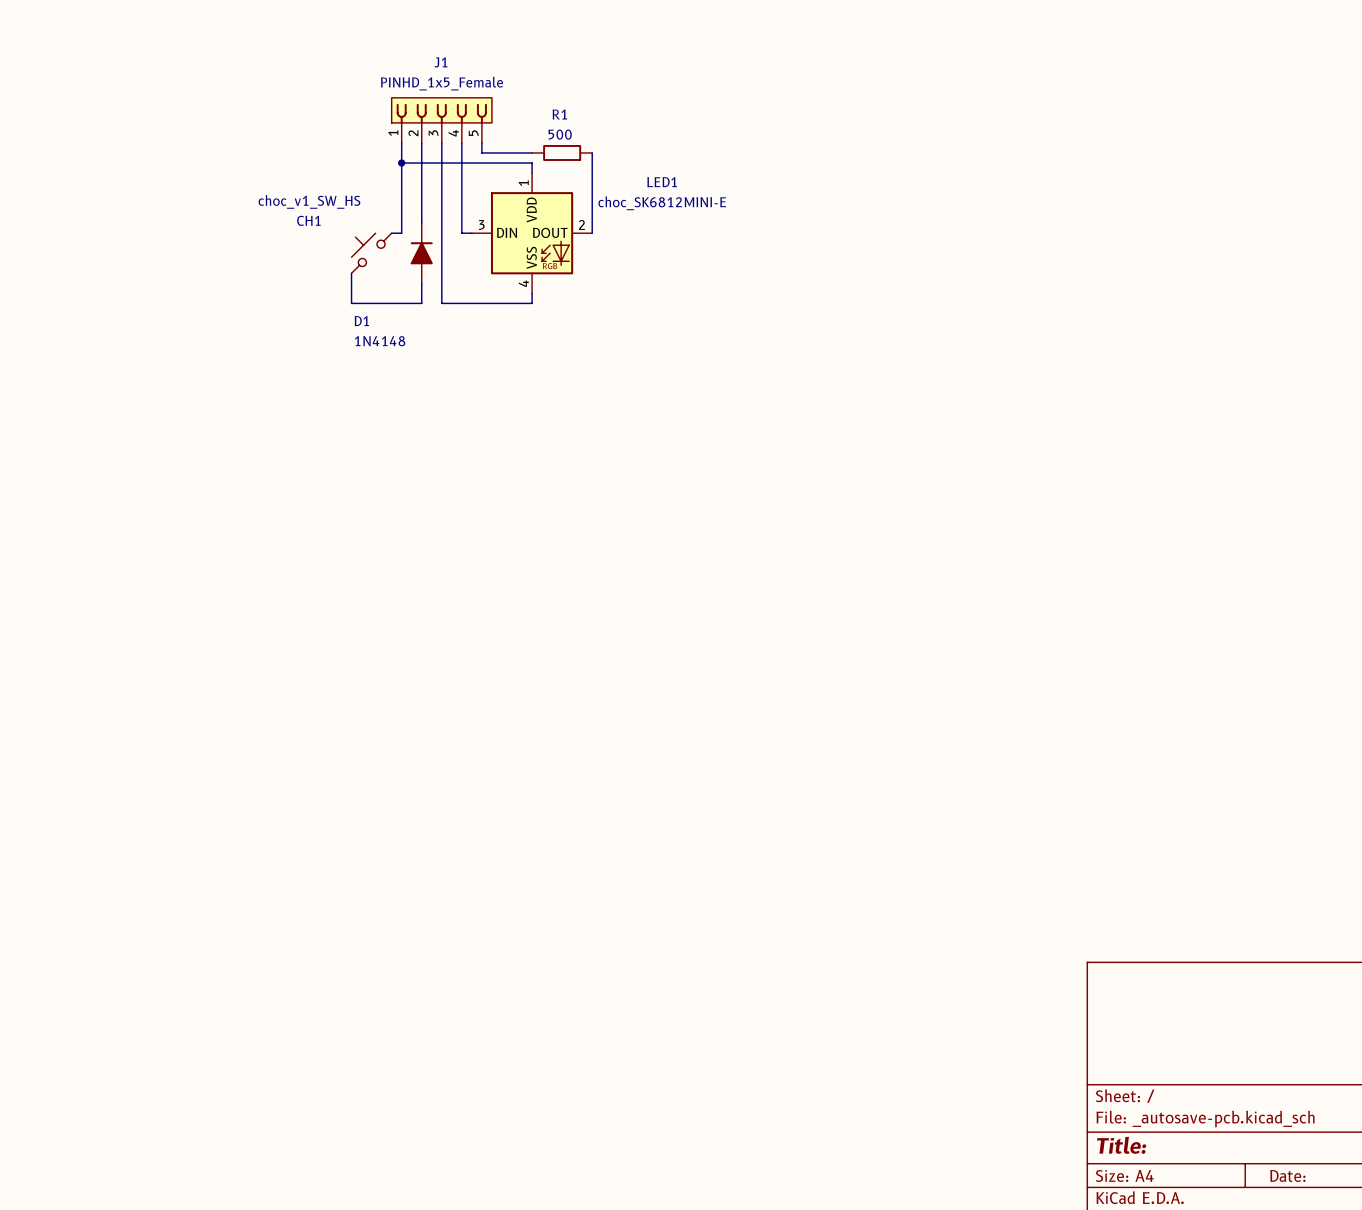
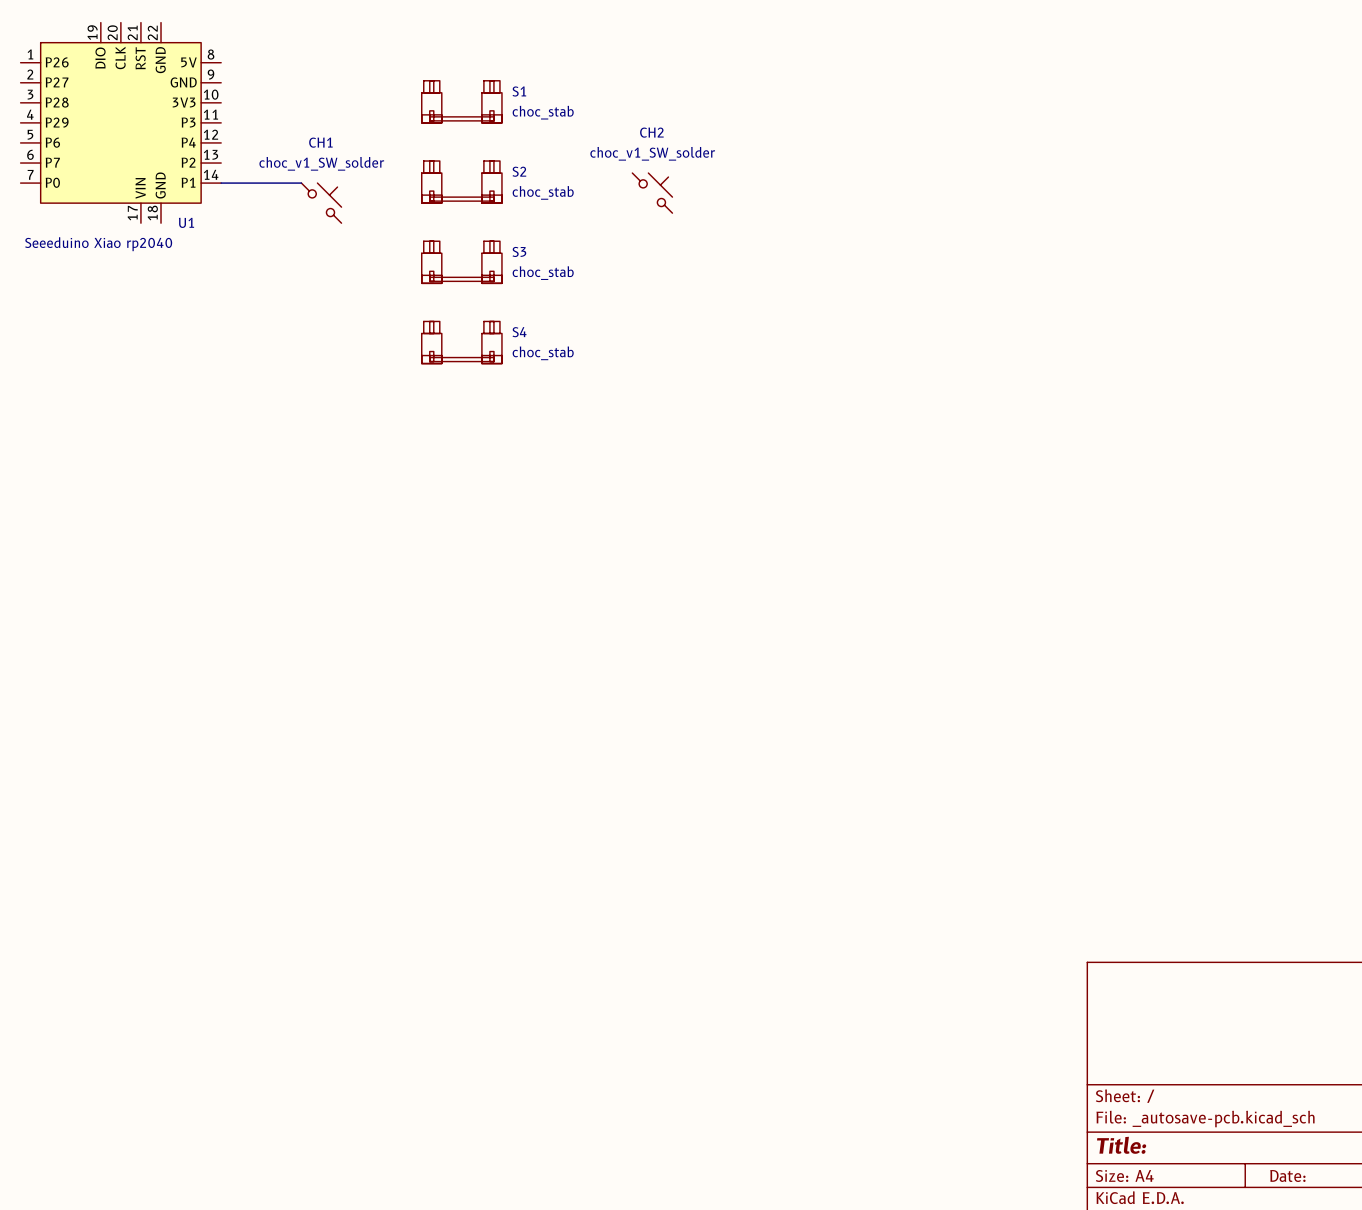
S1: none -> choc_stab (461, 101)
J1: PINHD_1x5_Female (441, 120) -> none
U1: none -> Seeeduino Xiao rp2040 (120, 122)
wire: (401, 142) (401, 233) (391, 233) -> none
wire: (421, 142) (421, 223) -> none
wire: (441, 142) (441, 303) (532, 303) (532, 293) -> none
wire: (461, 142) (461, 233) (471, 233) -> none
wire: (481, 142) (481, 152) (532, 152) -> none
R1: 500 (562, 152) -> none
wire: (592, 152) (592, 233) -> none
wire: (401, 163) (532, 163) (532, 173) -> none
junction: (401, 163) -> none
S2: none -> choc_stab (461, 182)
wire: none -> (221, 183) (301, 183)
CH2: none -> choc_v1_SW_solder (652, 193)
CH1 value: choc_v1_SW_HS (309, 201) -> choc_v1_SW_solder (321, 163)
CH1 name position: CH1 (308, 220) -> CH1 (320, 142)
LED1: choc_SK6812MINI-E (532, 233) -> none
CH1 rotation: 0° (371, 253) -> 90° clockwise (321, 203)
CH1 position: (371, 253) -> (321, 203)
D1: 1N4148 (421, 253) -> none
S3: none -> choc_stab (461, 262)
wire: (351, 273) (351, 303) (421, 303) (421, 283) -> none
S4: none -> choc_stab (461, 342)

